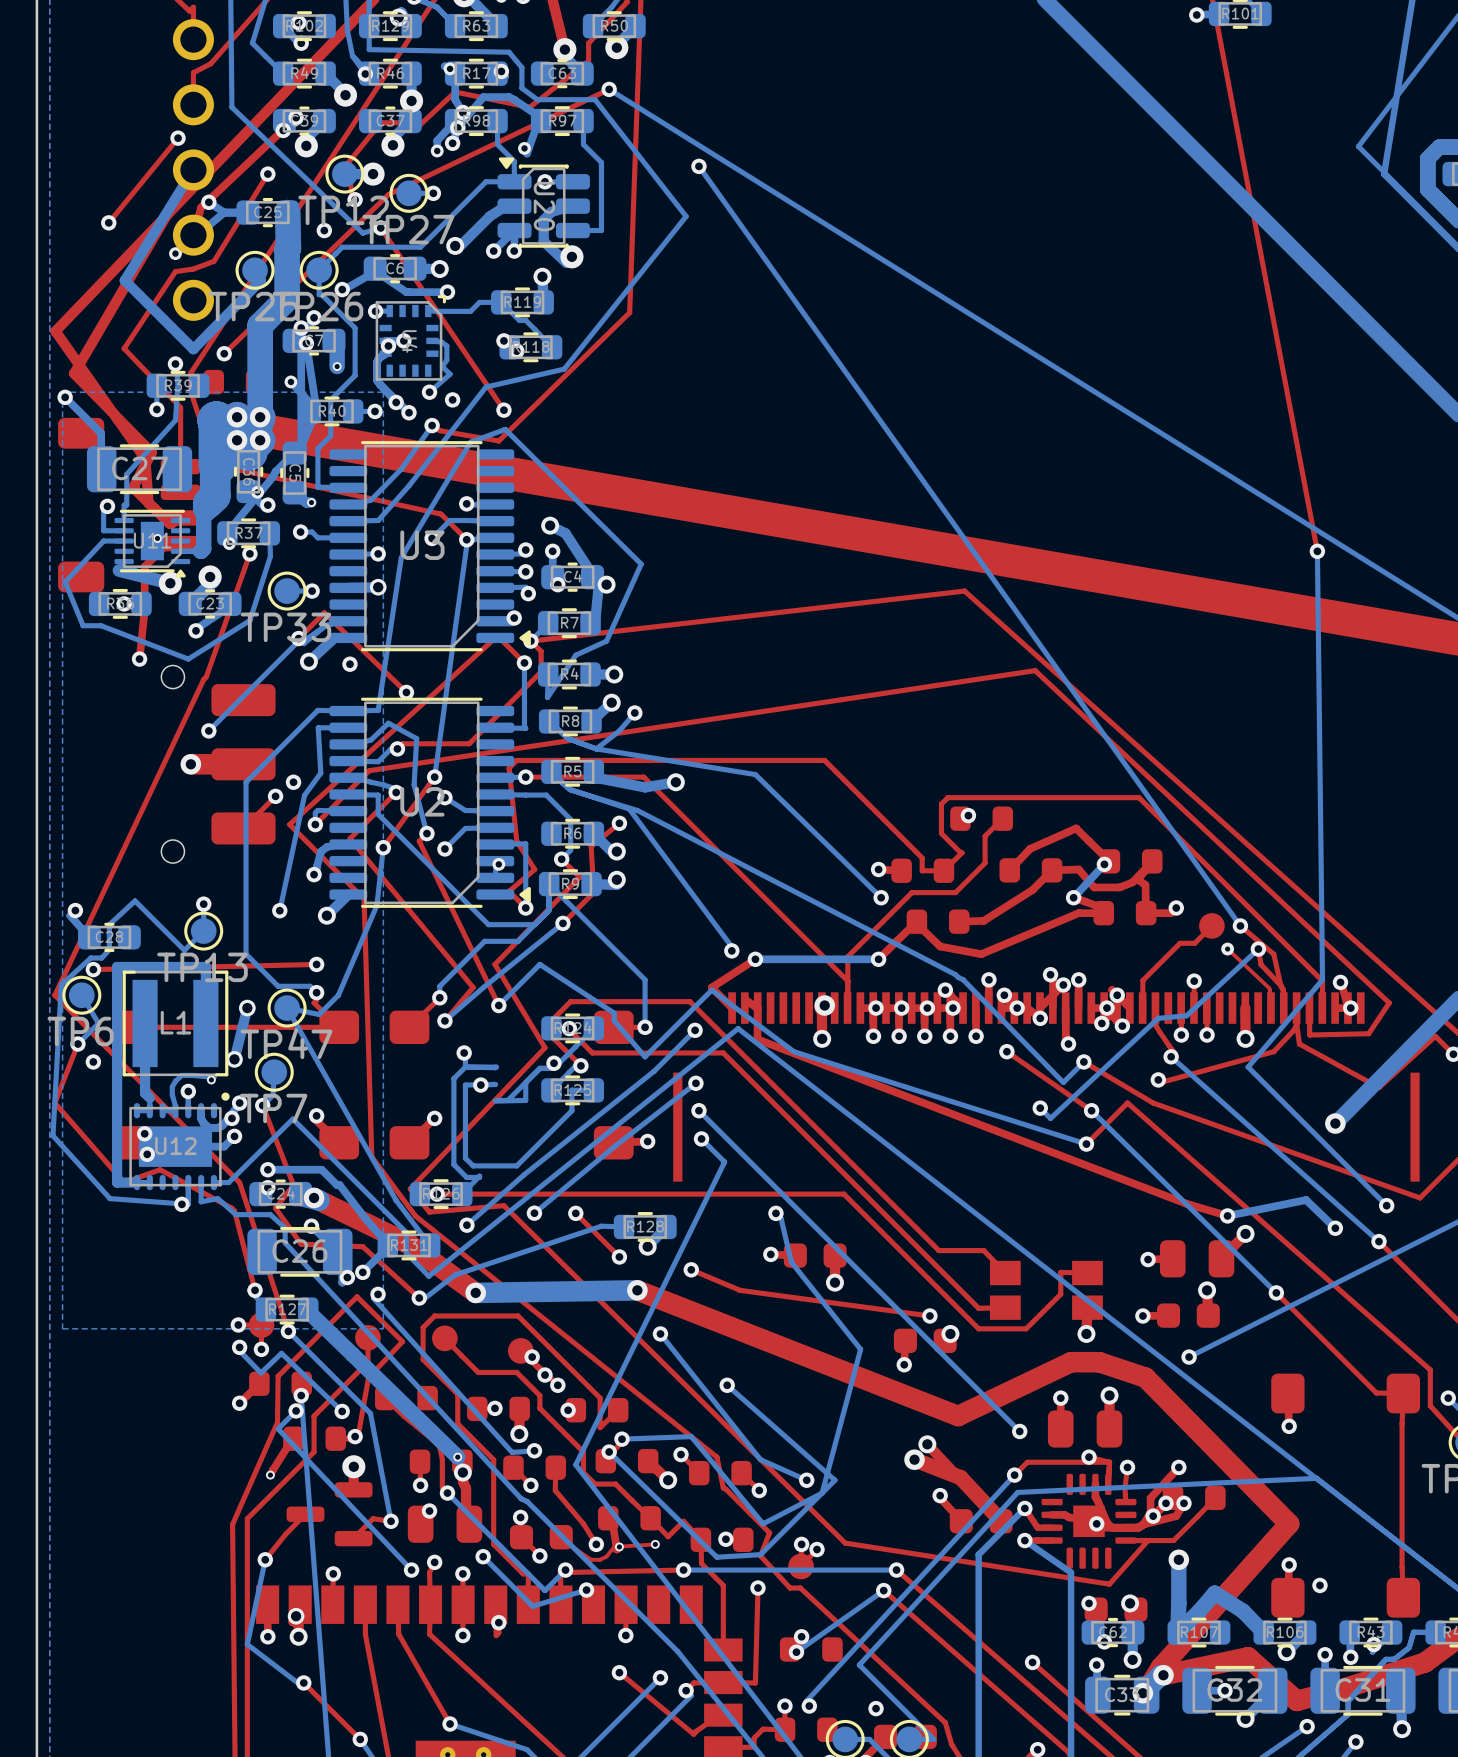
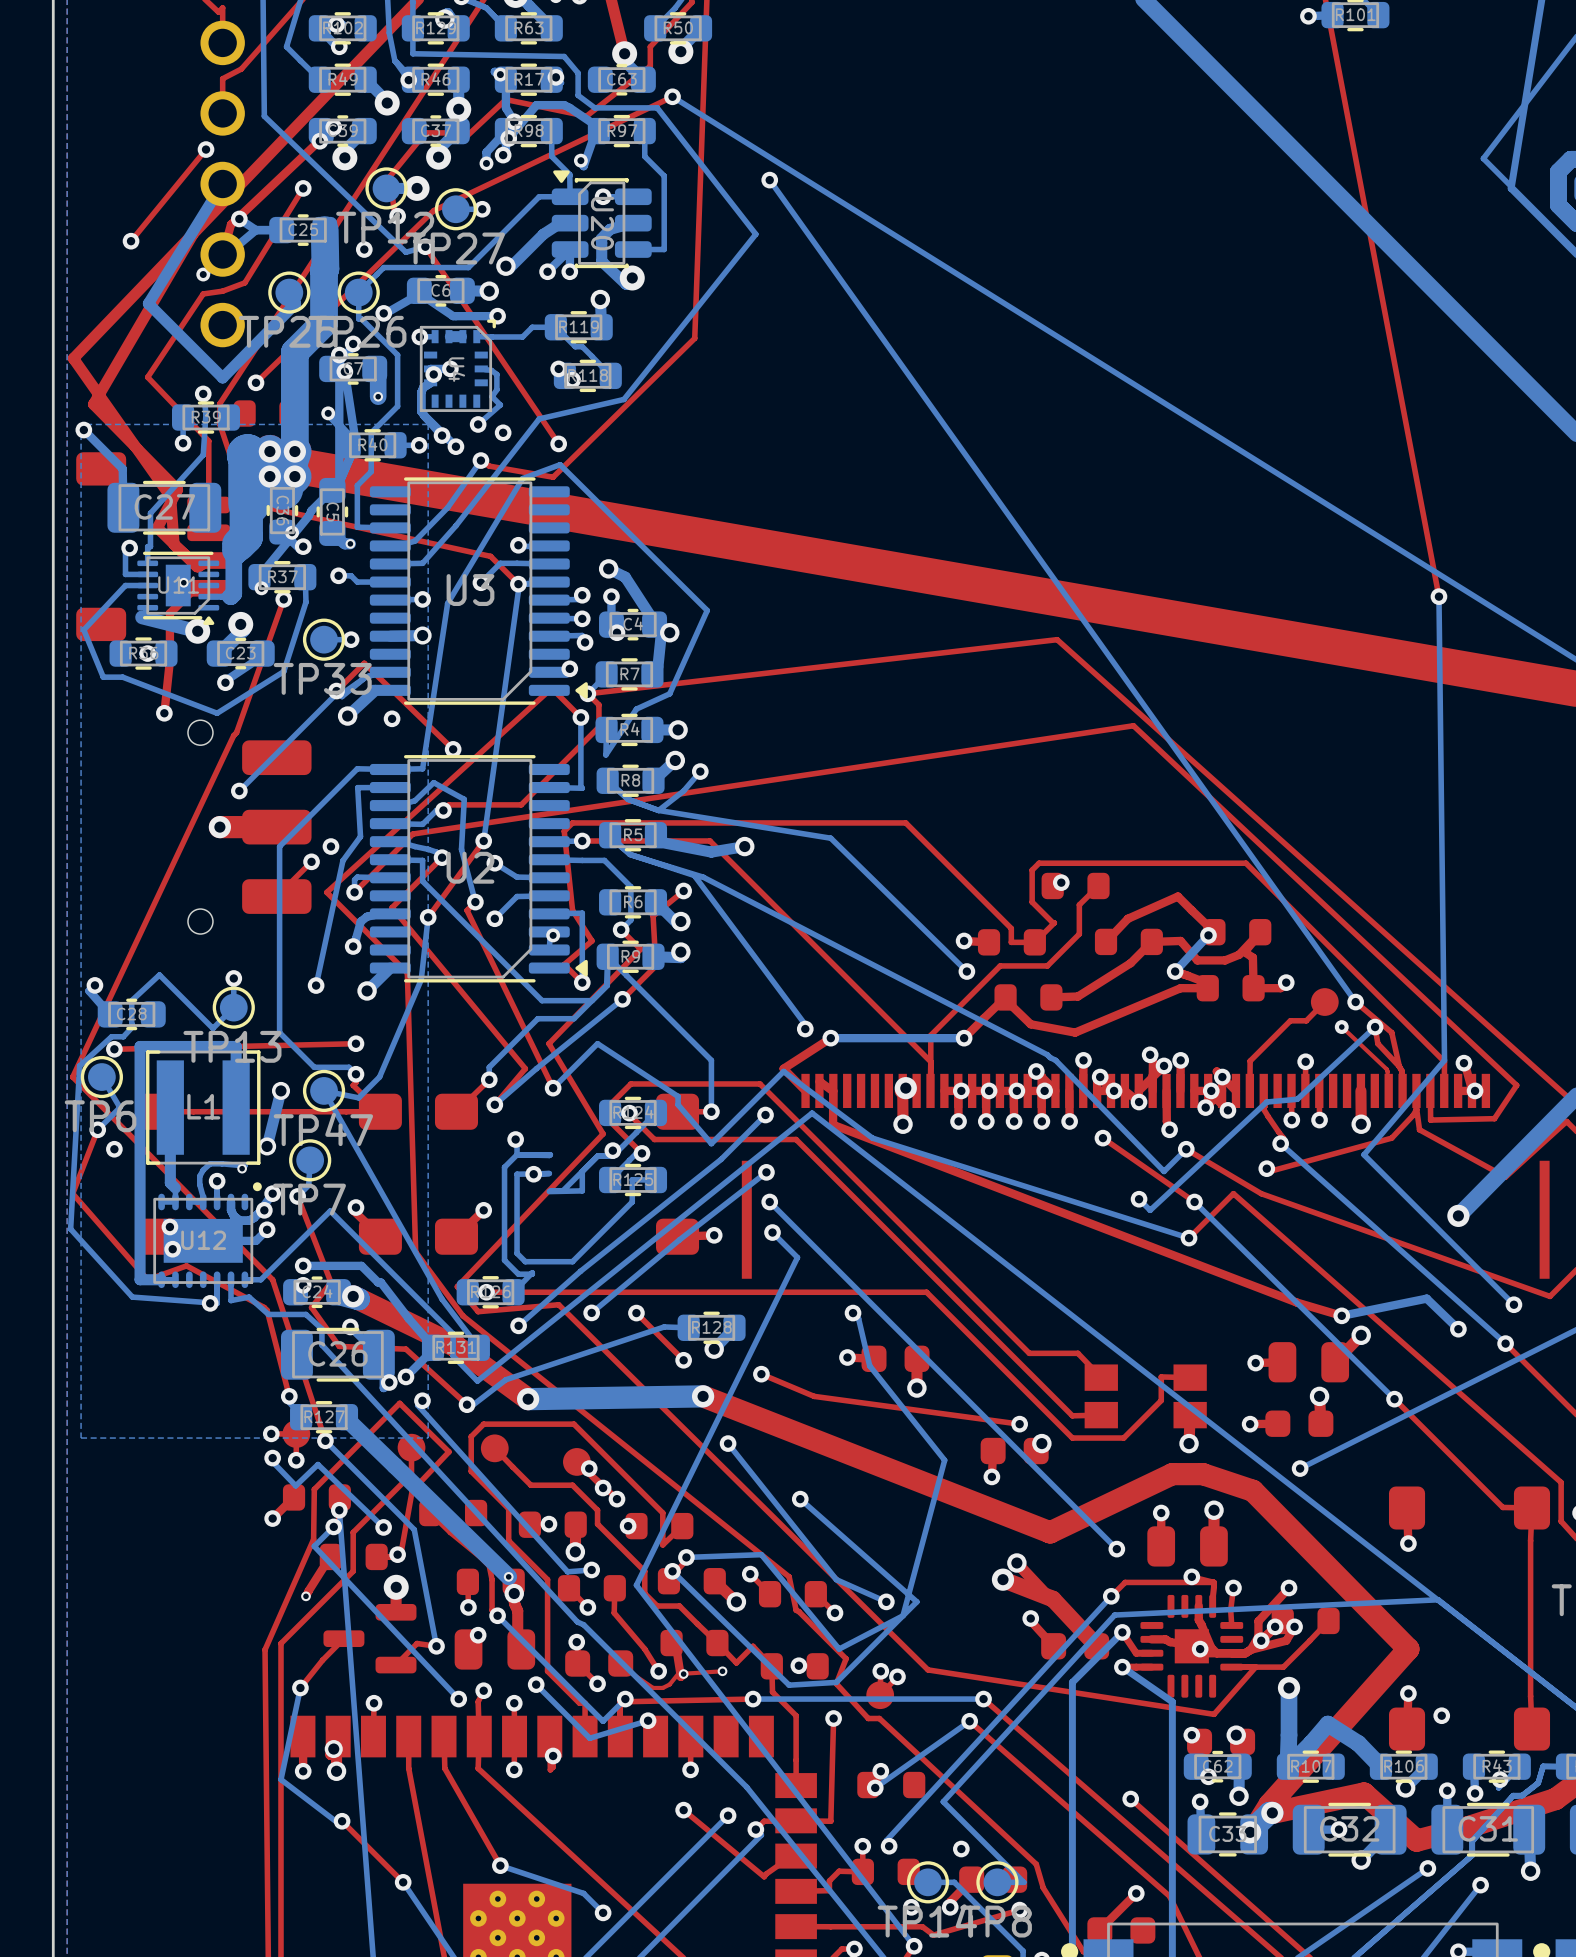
bottom track: none -> (461, 336) (450, 336)

